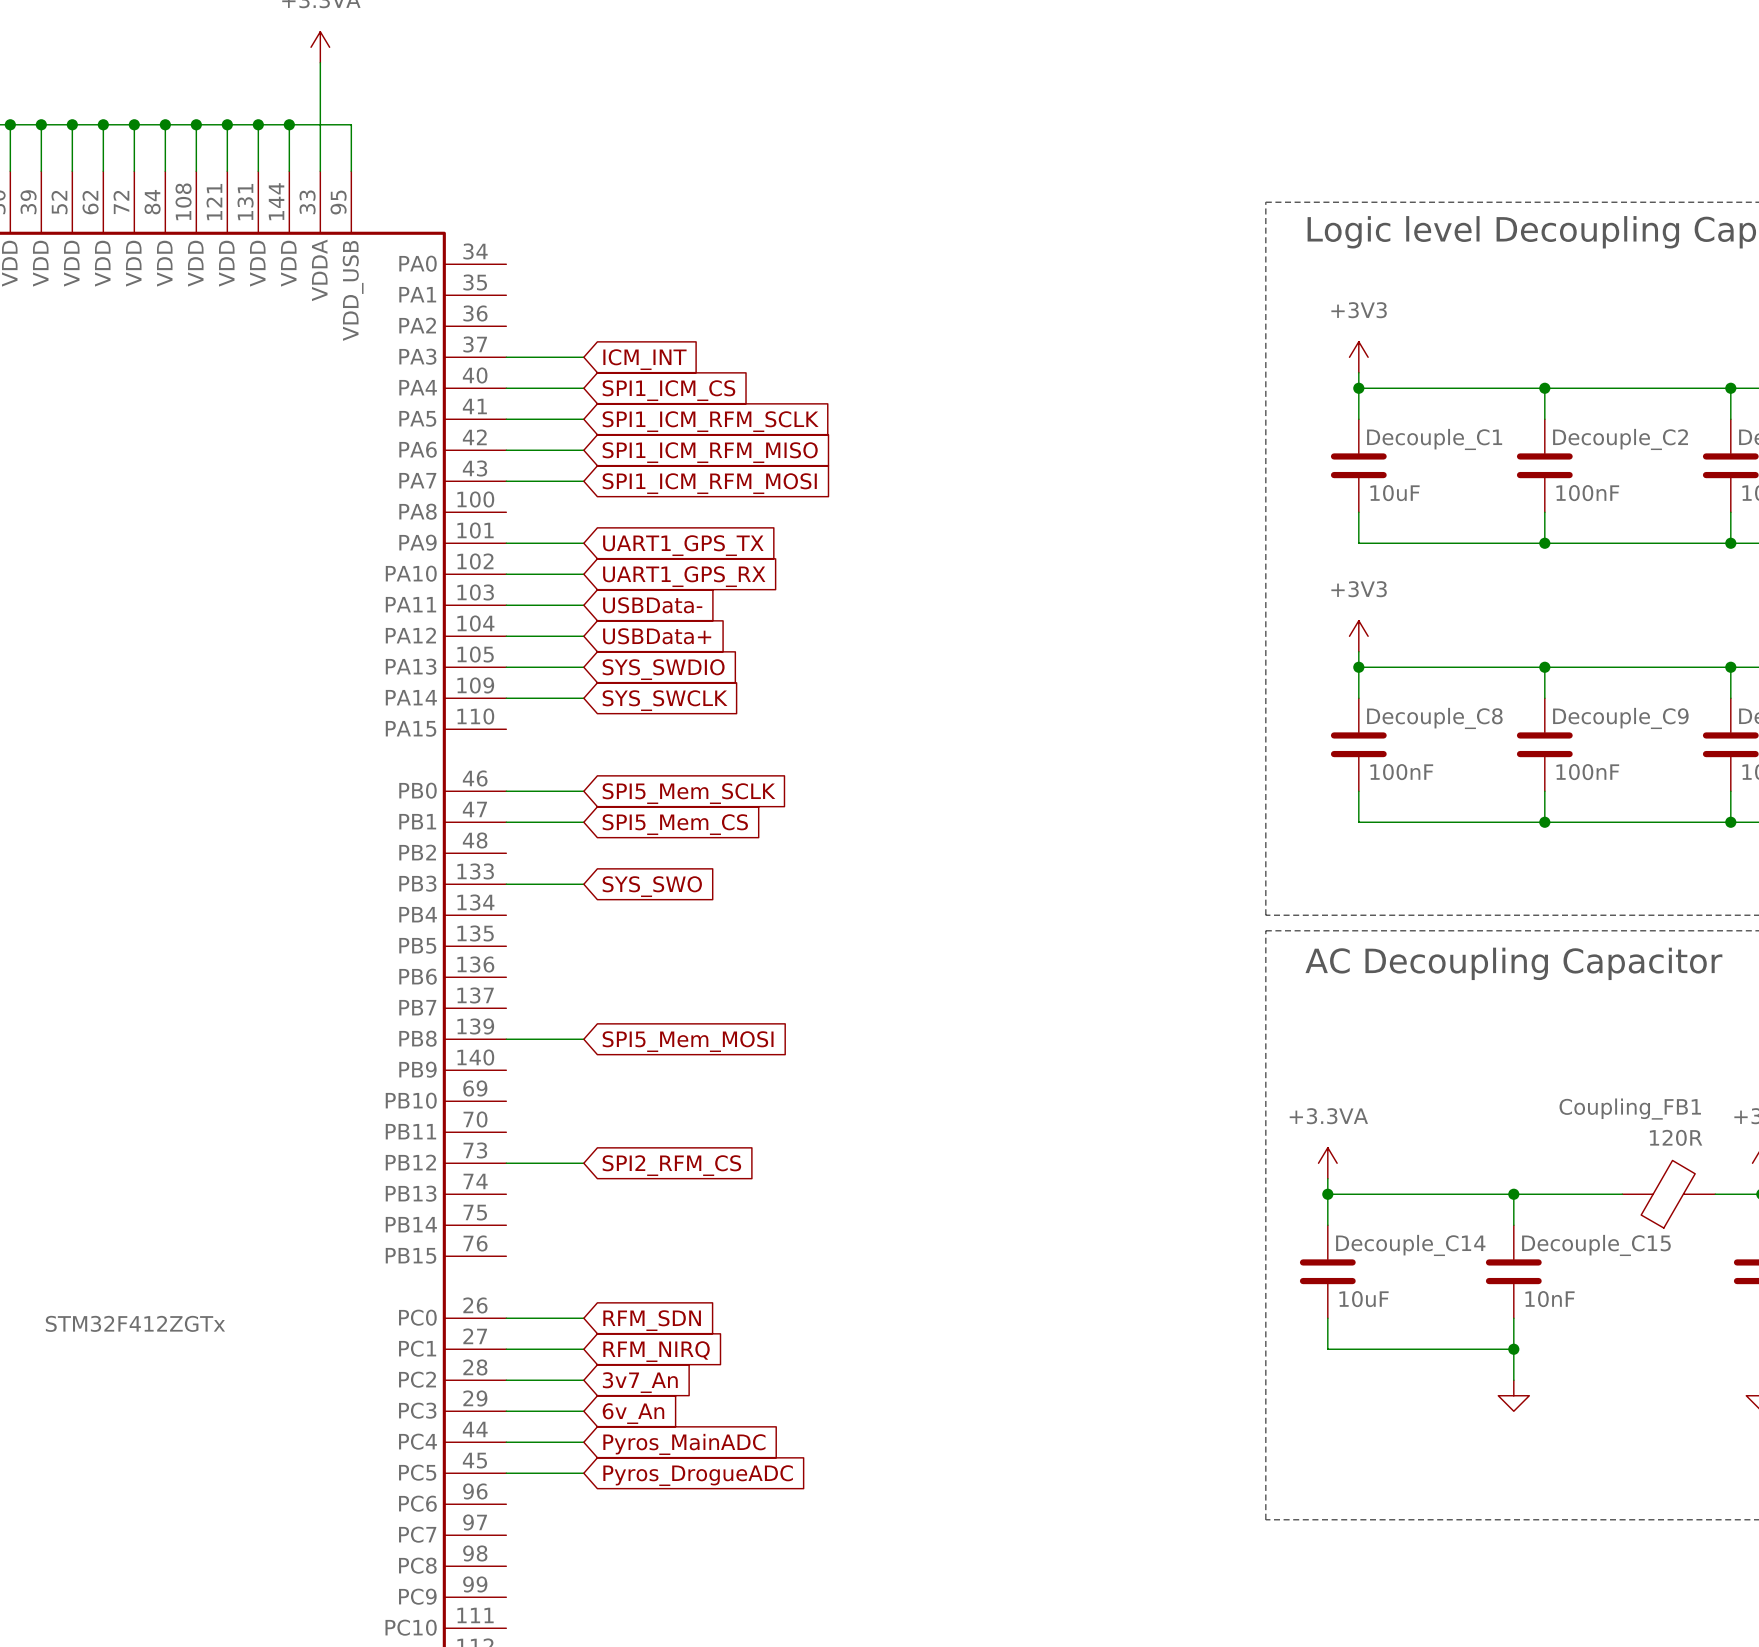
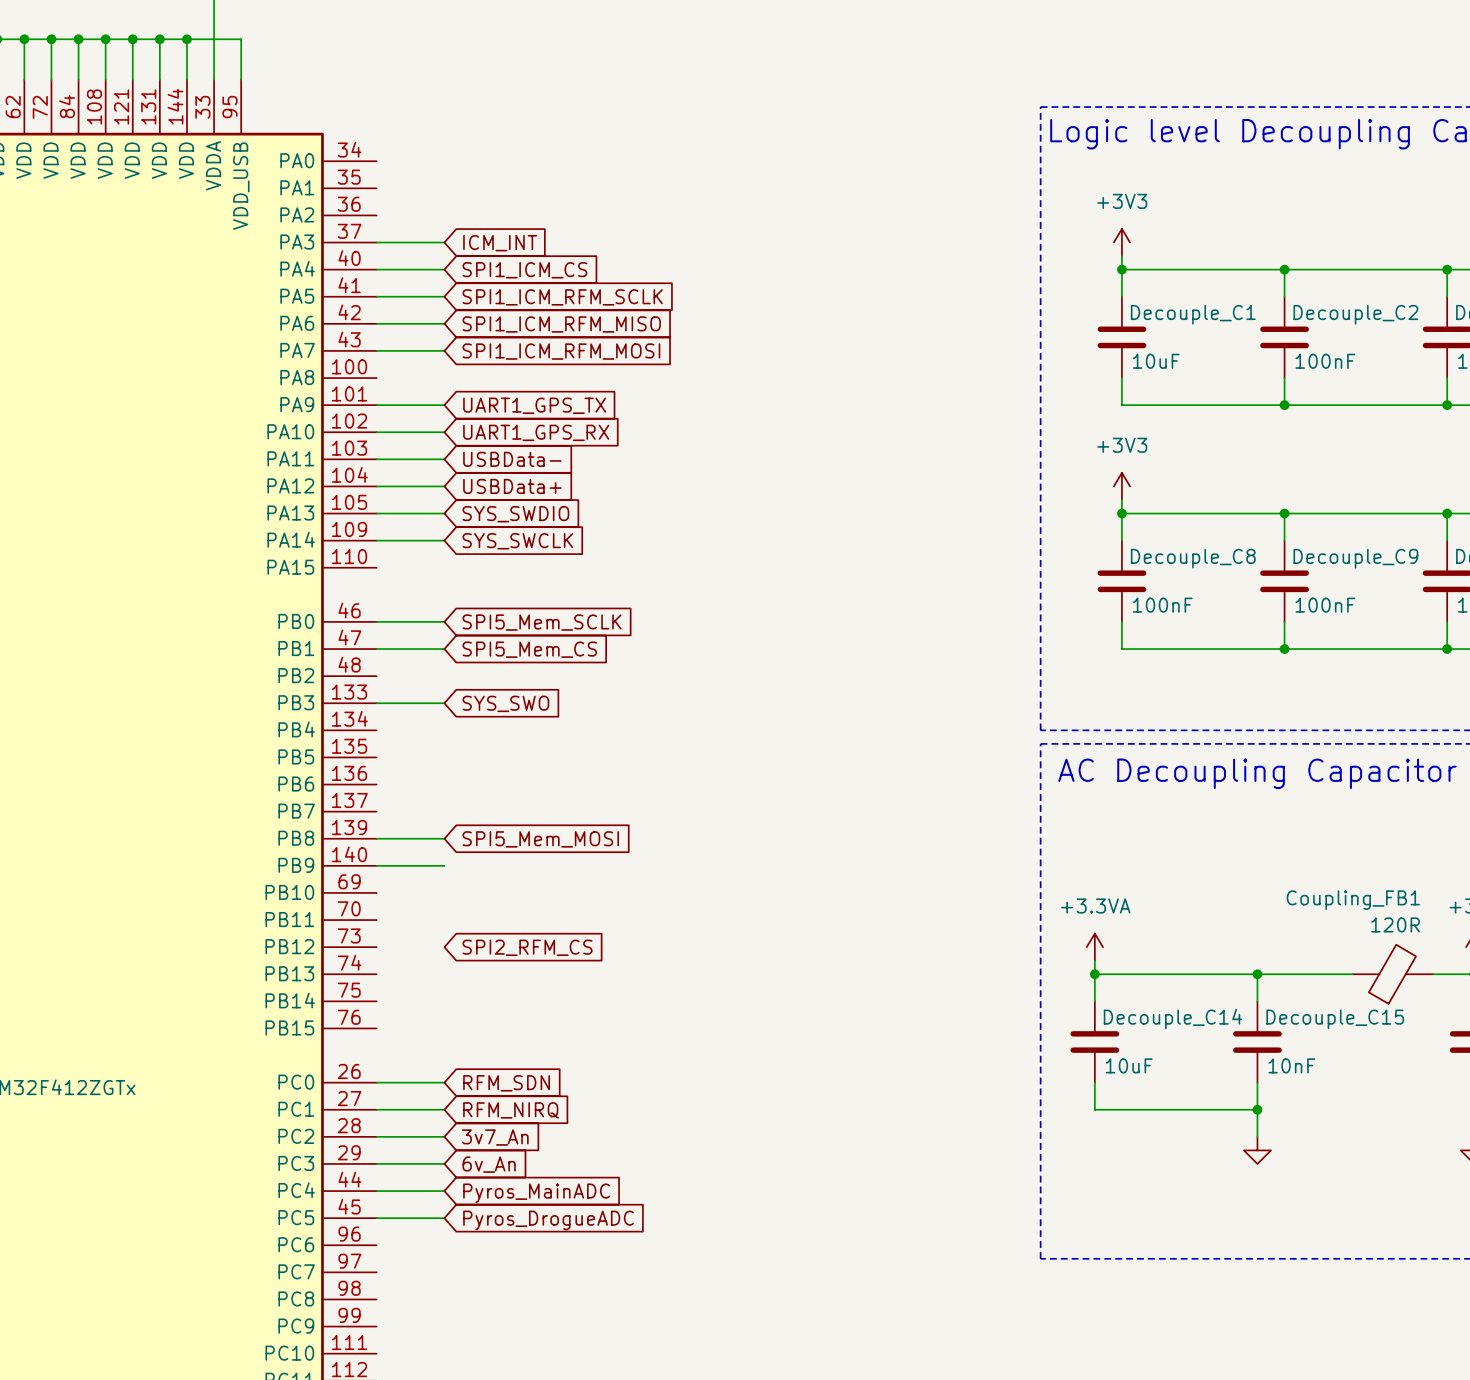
wire: (506, 1163) (583, 1163) -> (376, 865) (444, 865)

